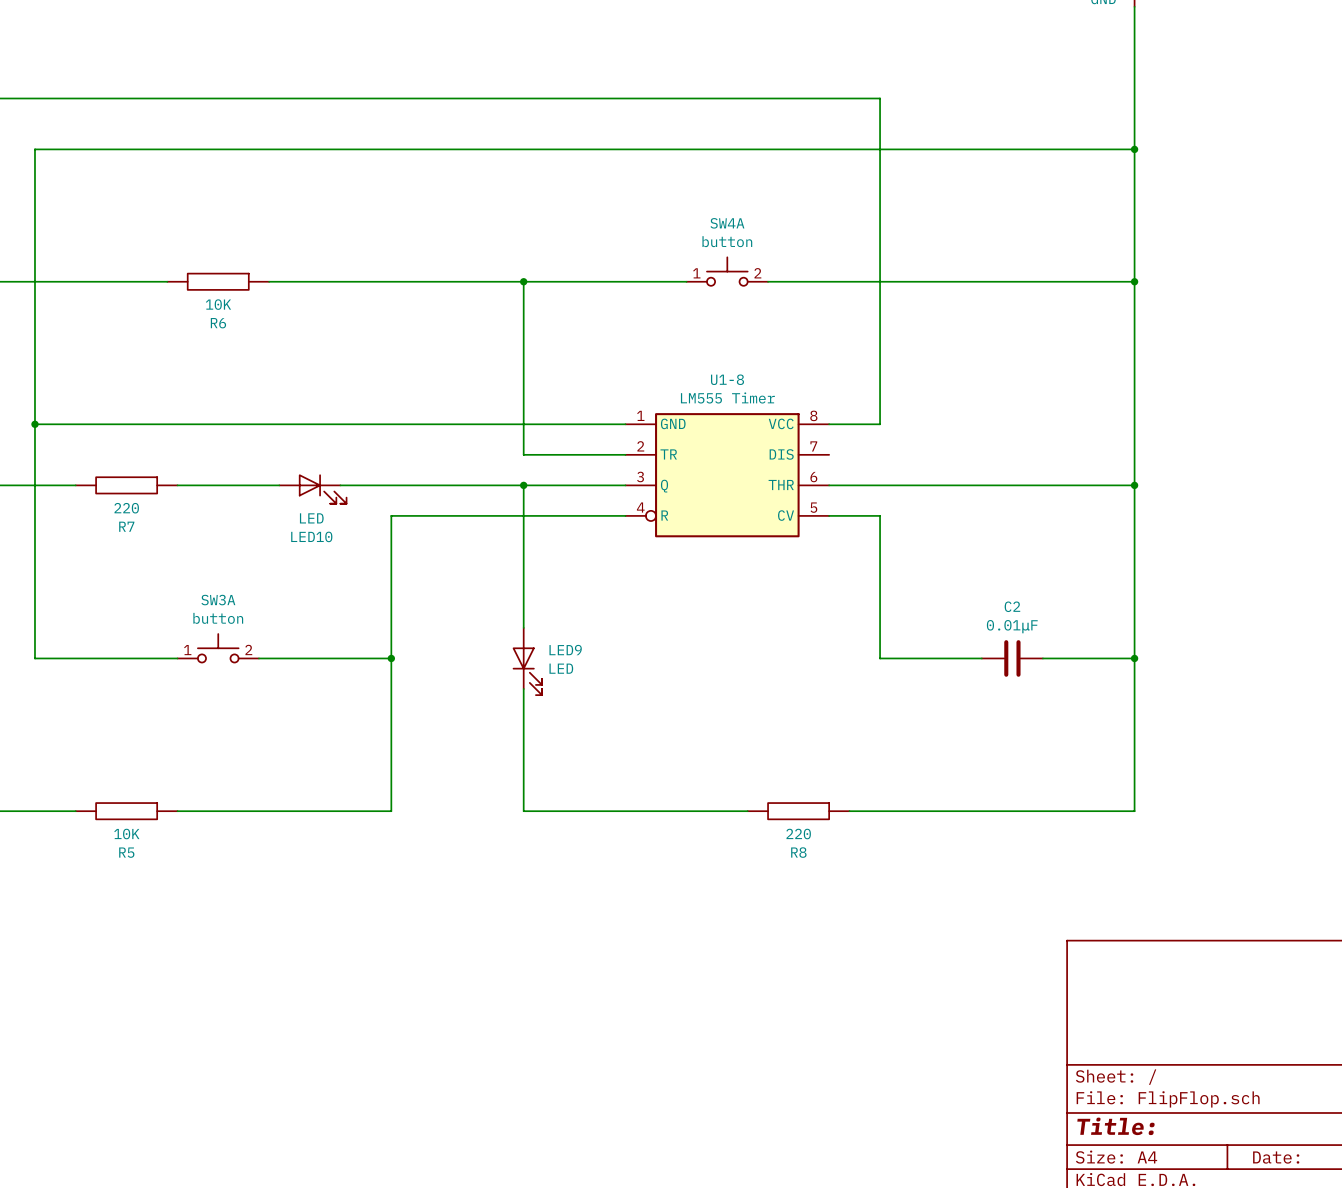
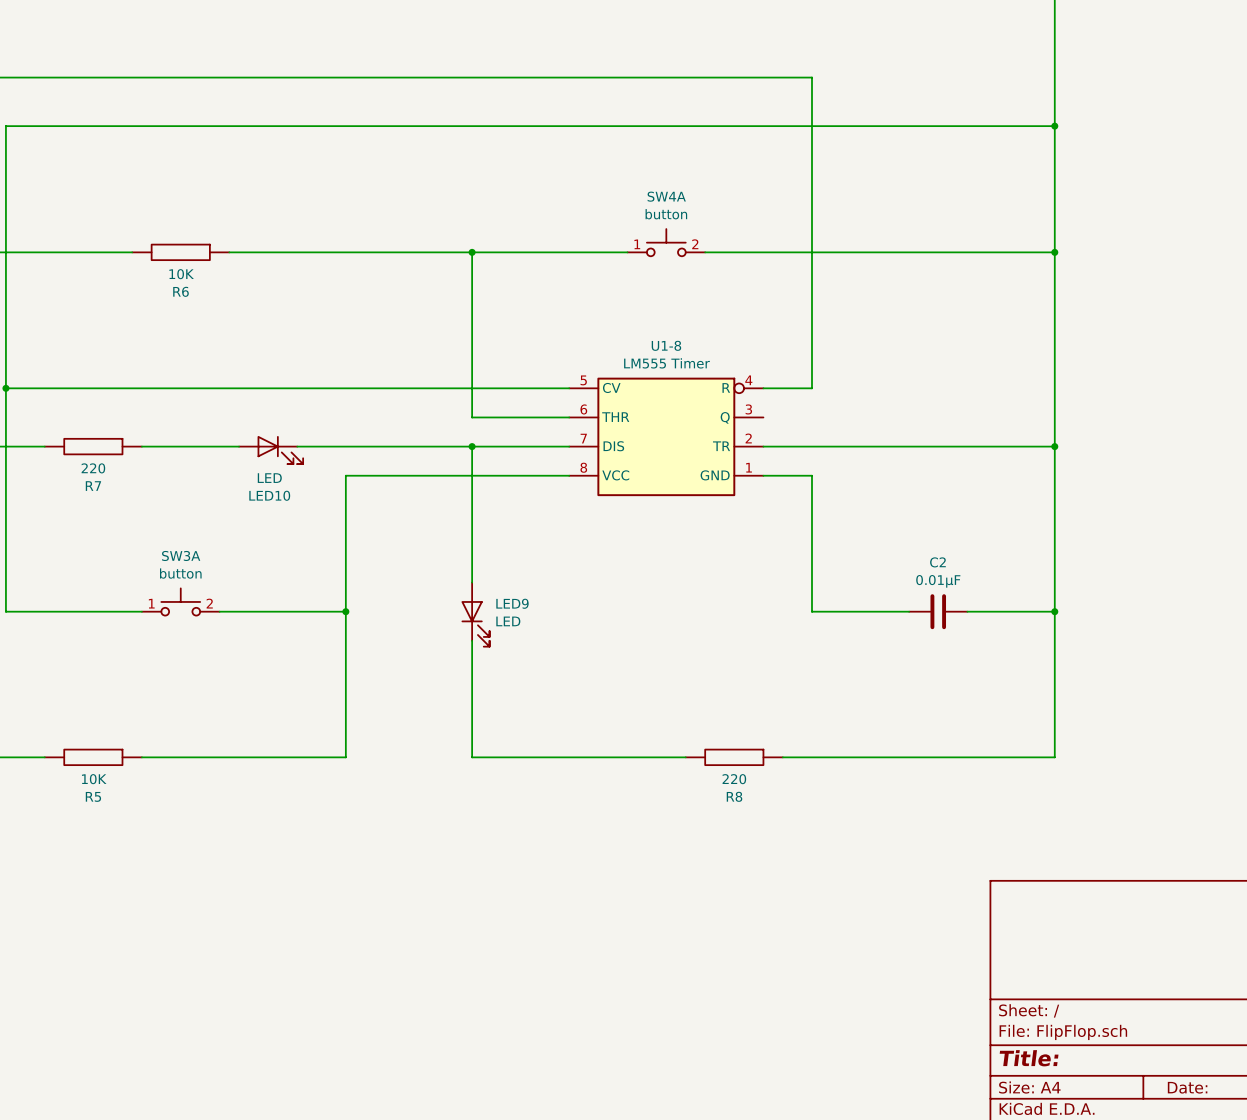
U1-8 symbol: [625, 413, 830, 538] -> [569, 377, 764, 497]

